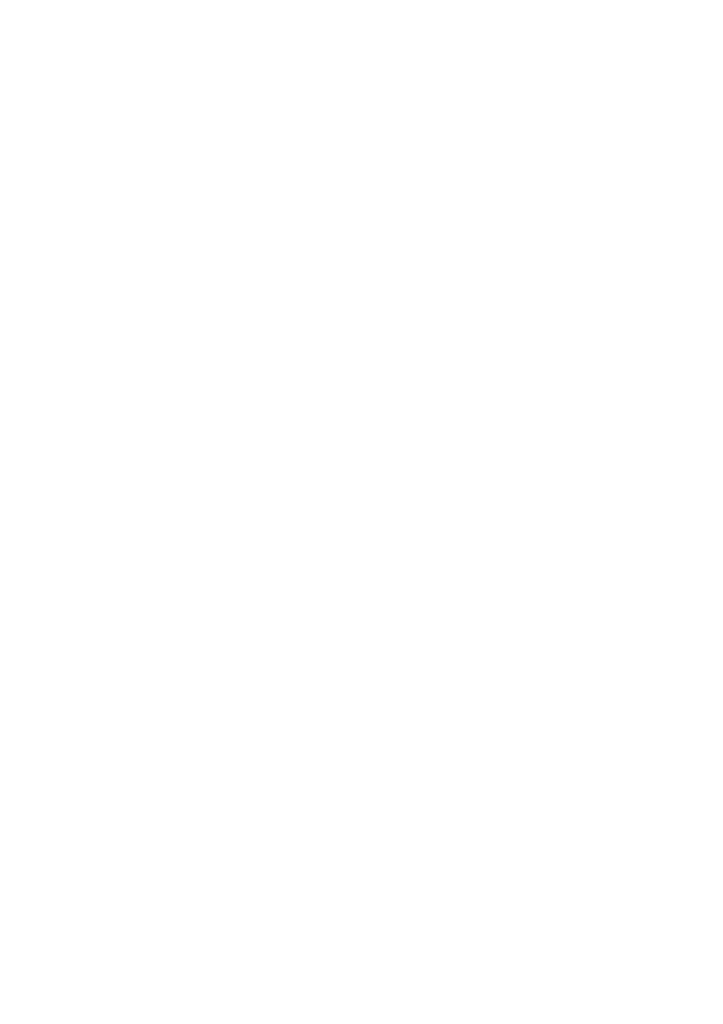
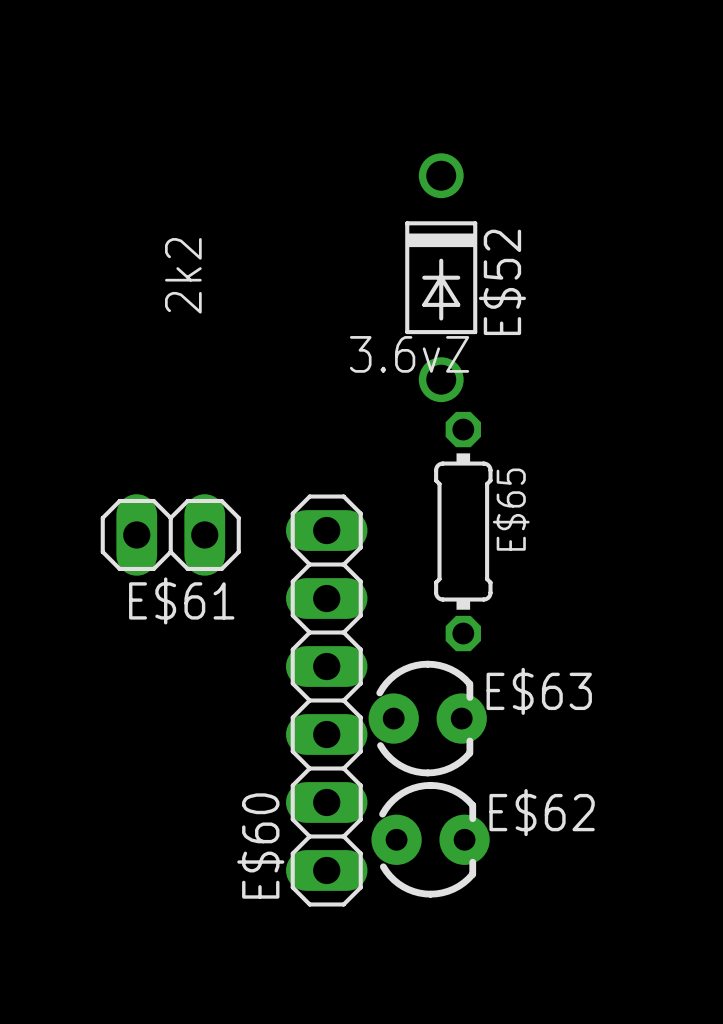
text: none -> 2k2 (183, 275)
E$52: none -> (441, 277)
text: none -> 3.6vZ (409, 354)
E$65: none -> (463, 531)
E$61: none -> (170, 534)
E$60: none -> (326, 700)
E$63: none -> (427, 718)
E$62: none -> (430, 839)

